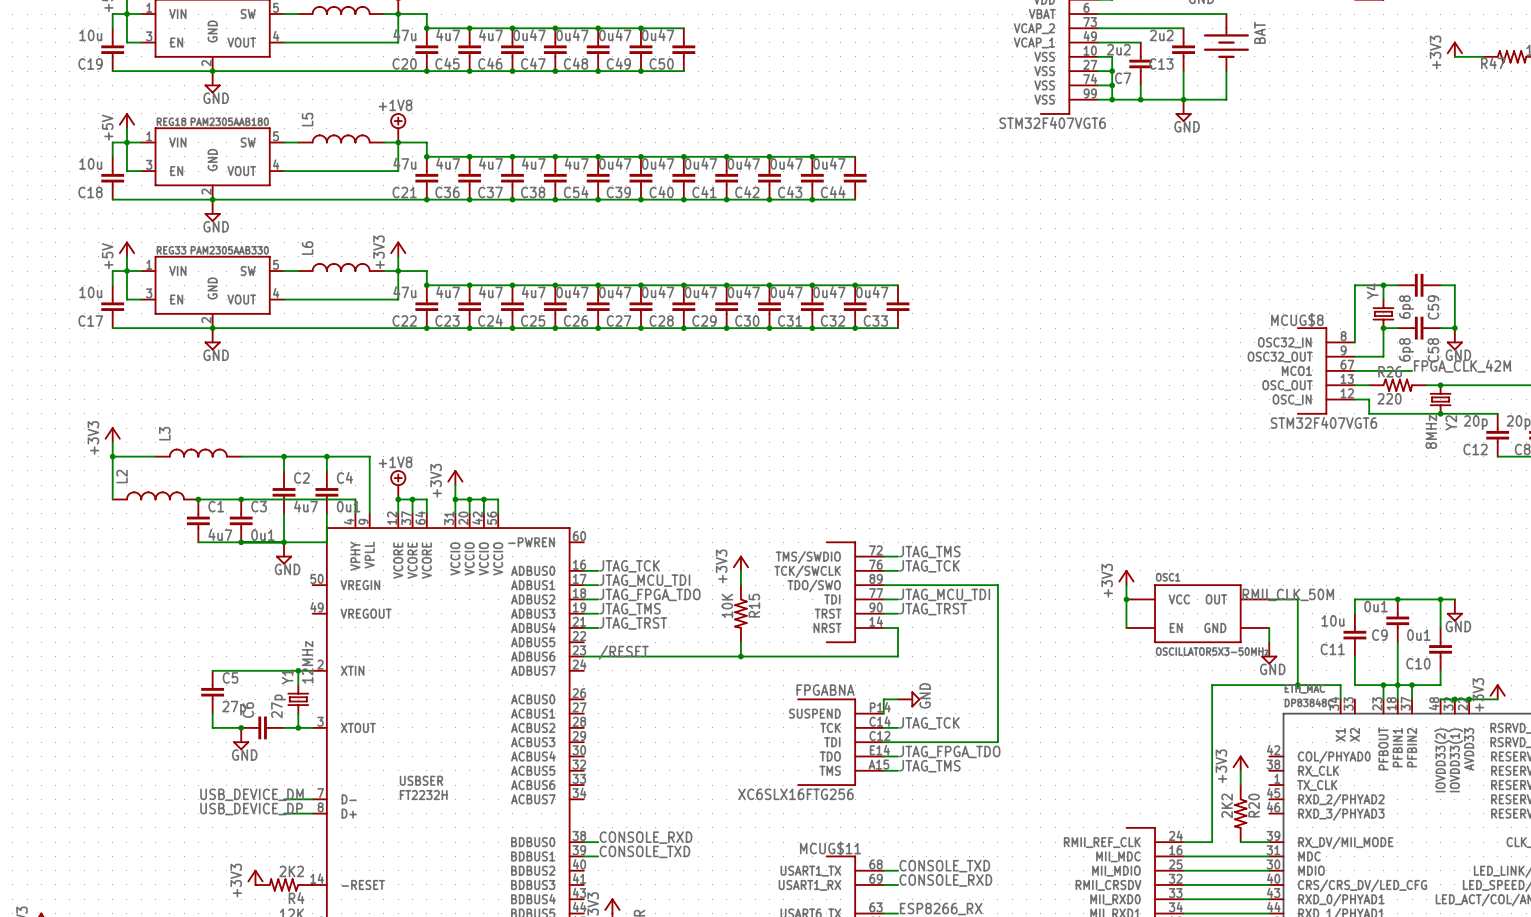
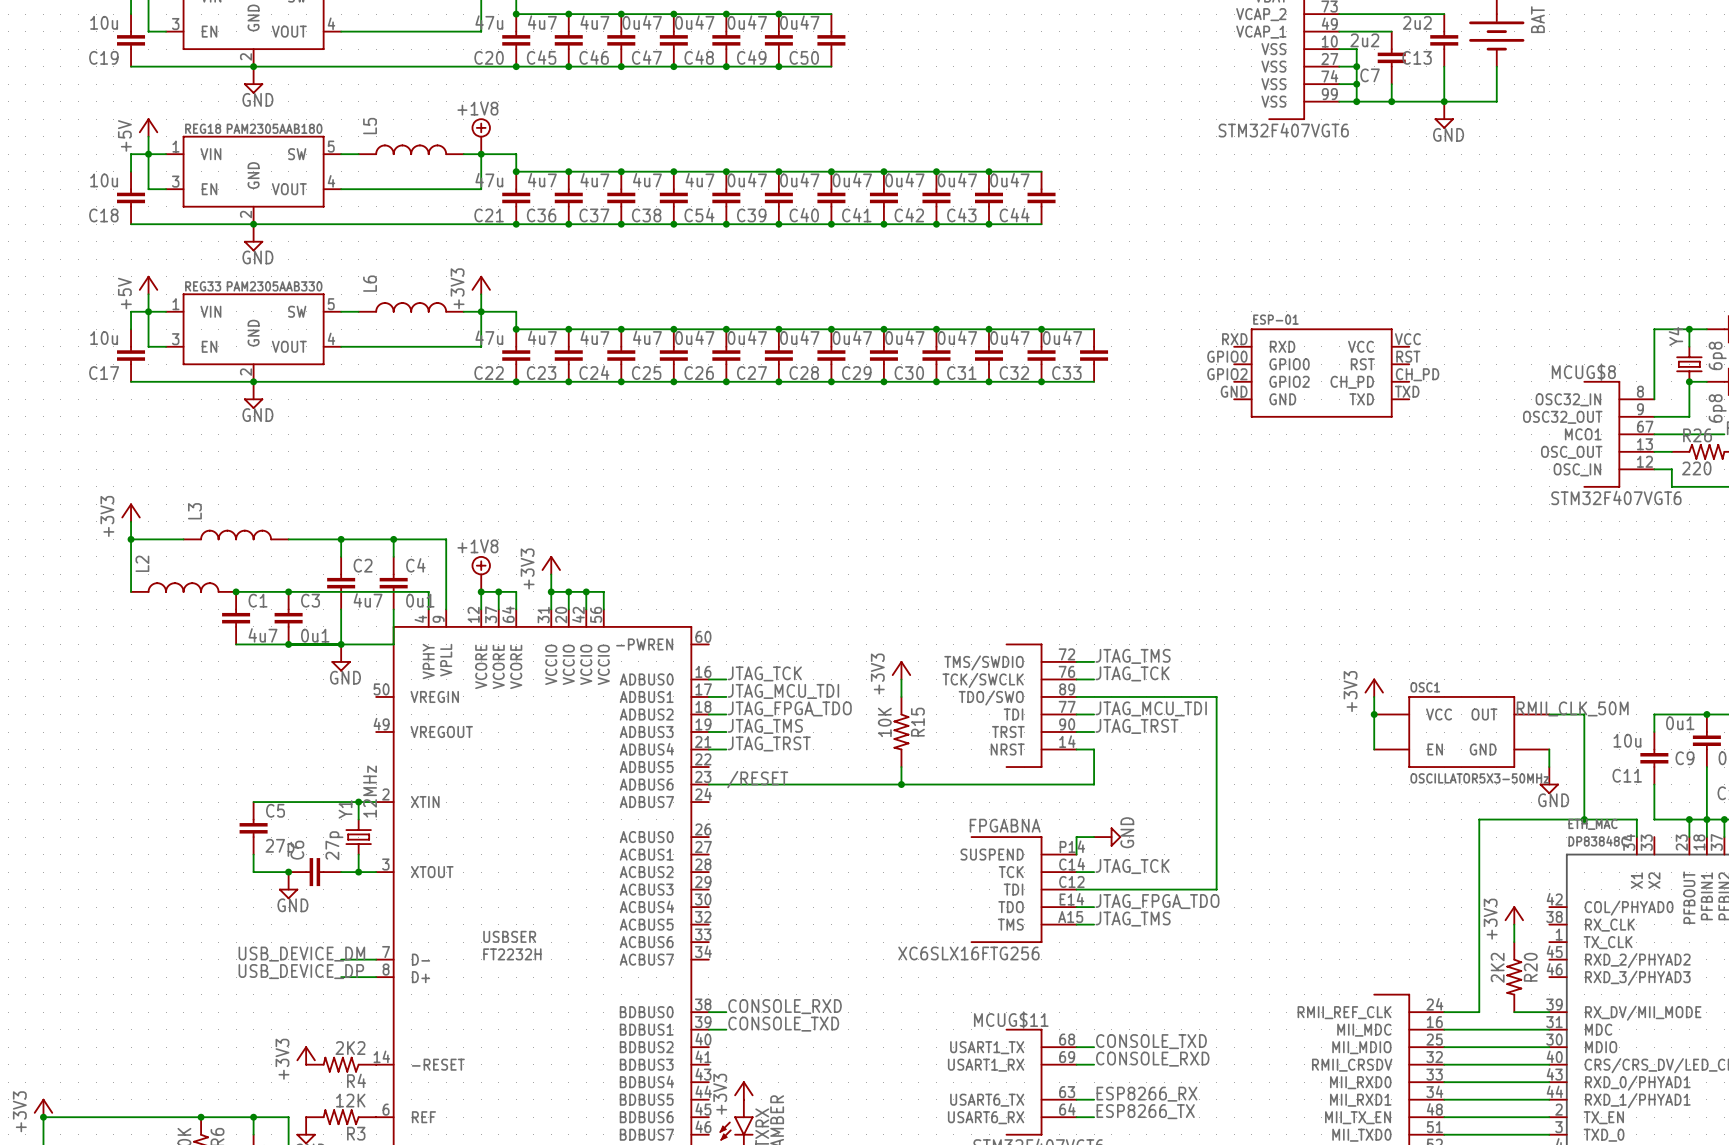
ESP-01: none -> (1321, 373)

